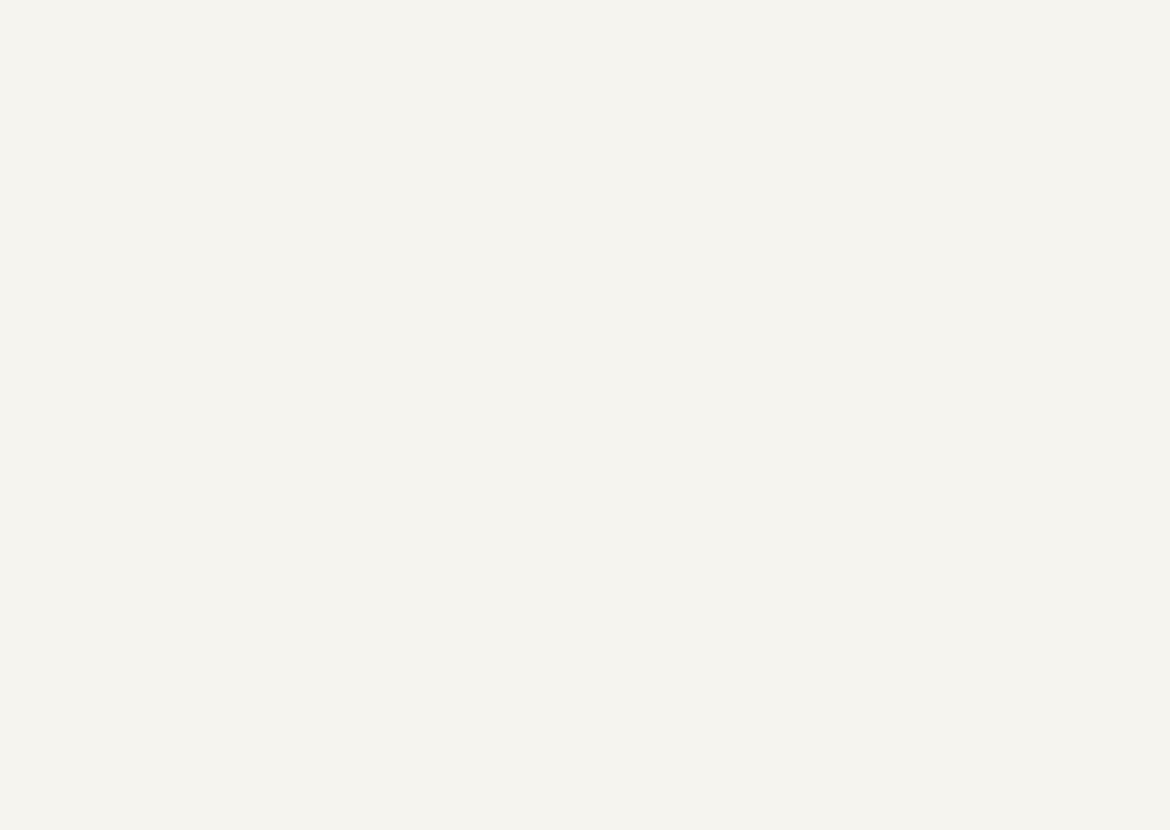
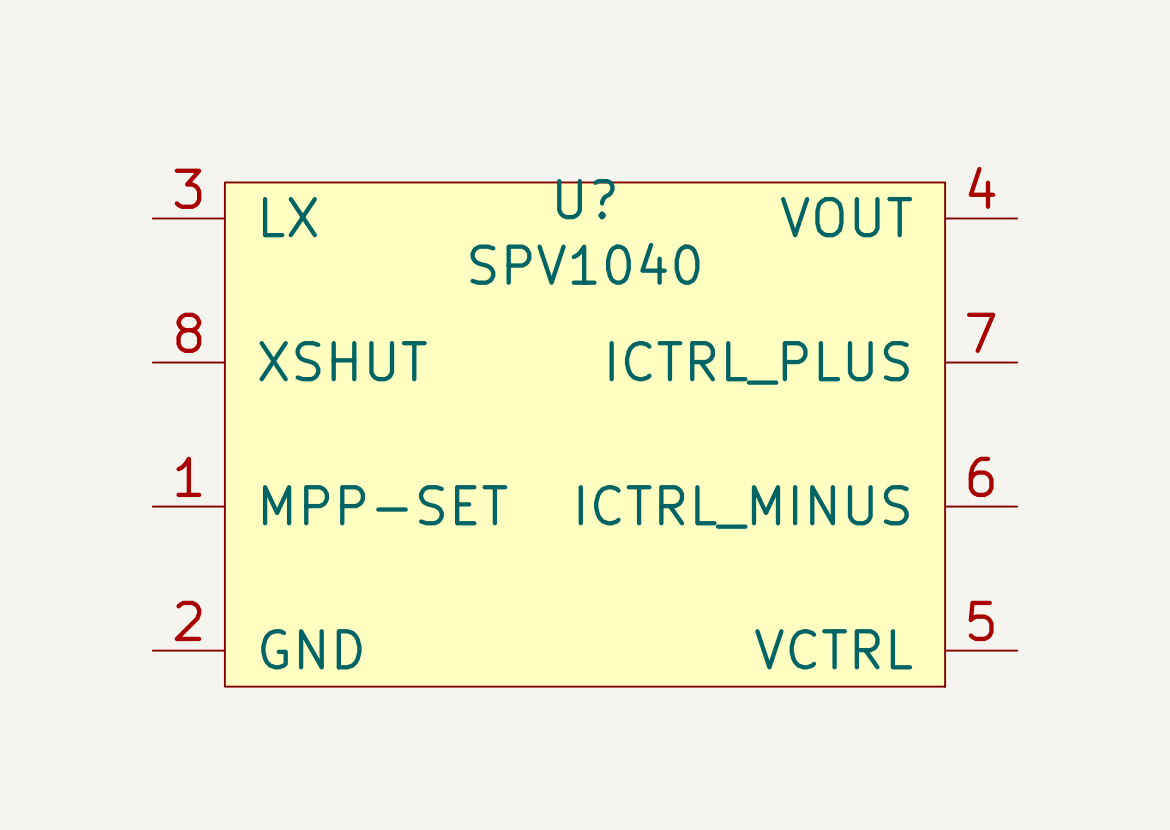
U?: none -> SPV1040 (584, 434)

